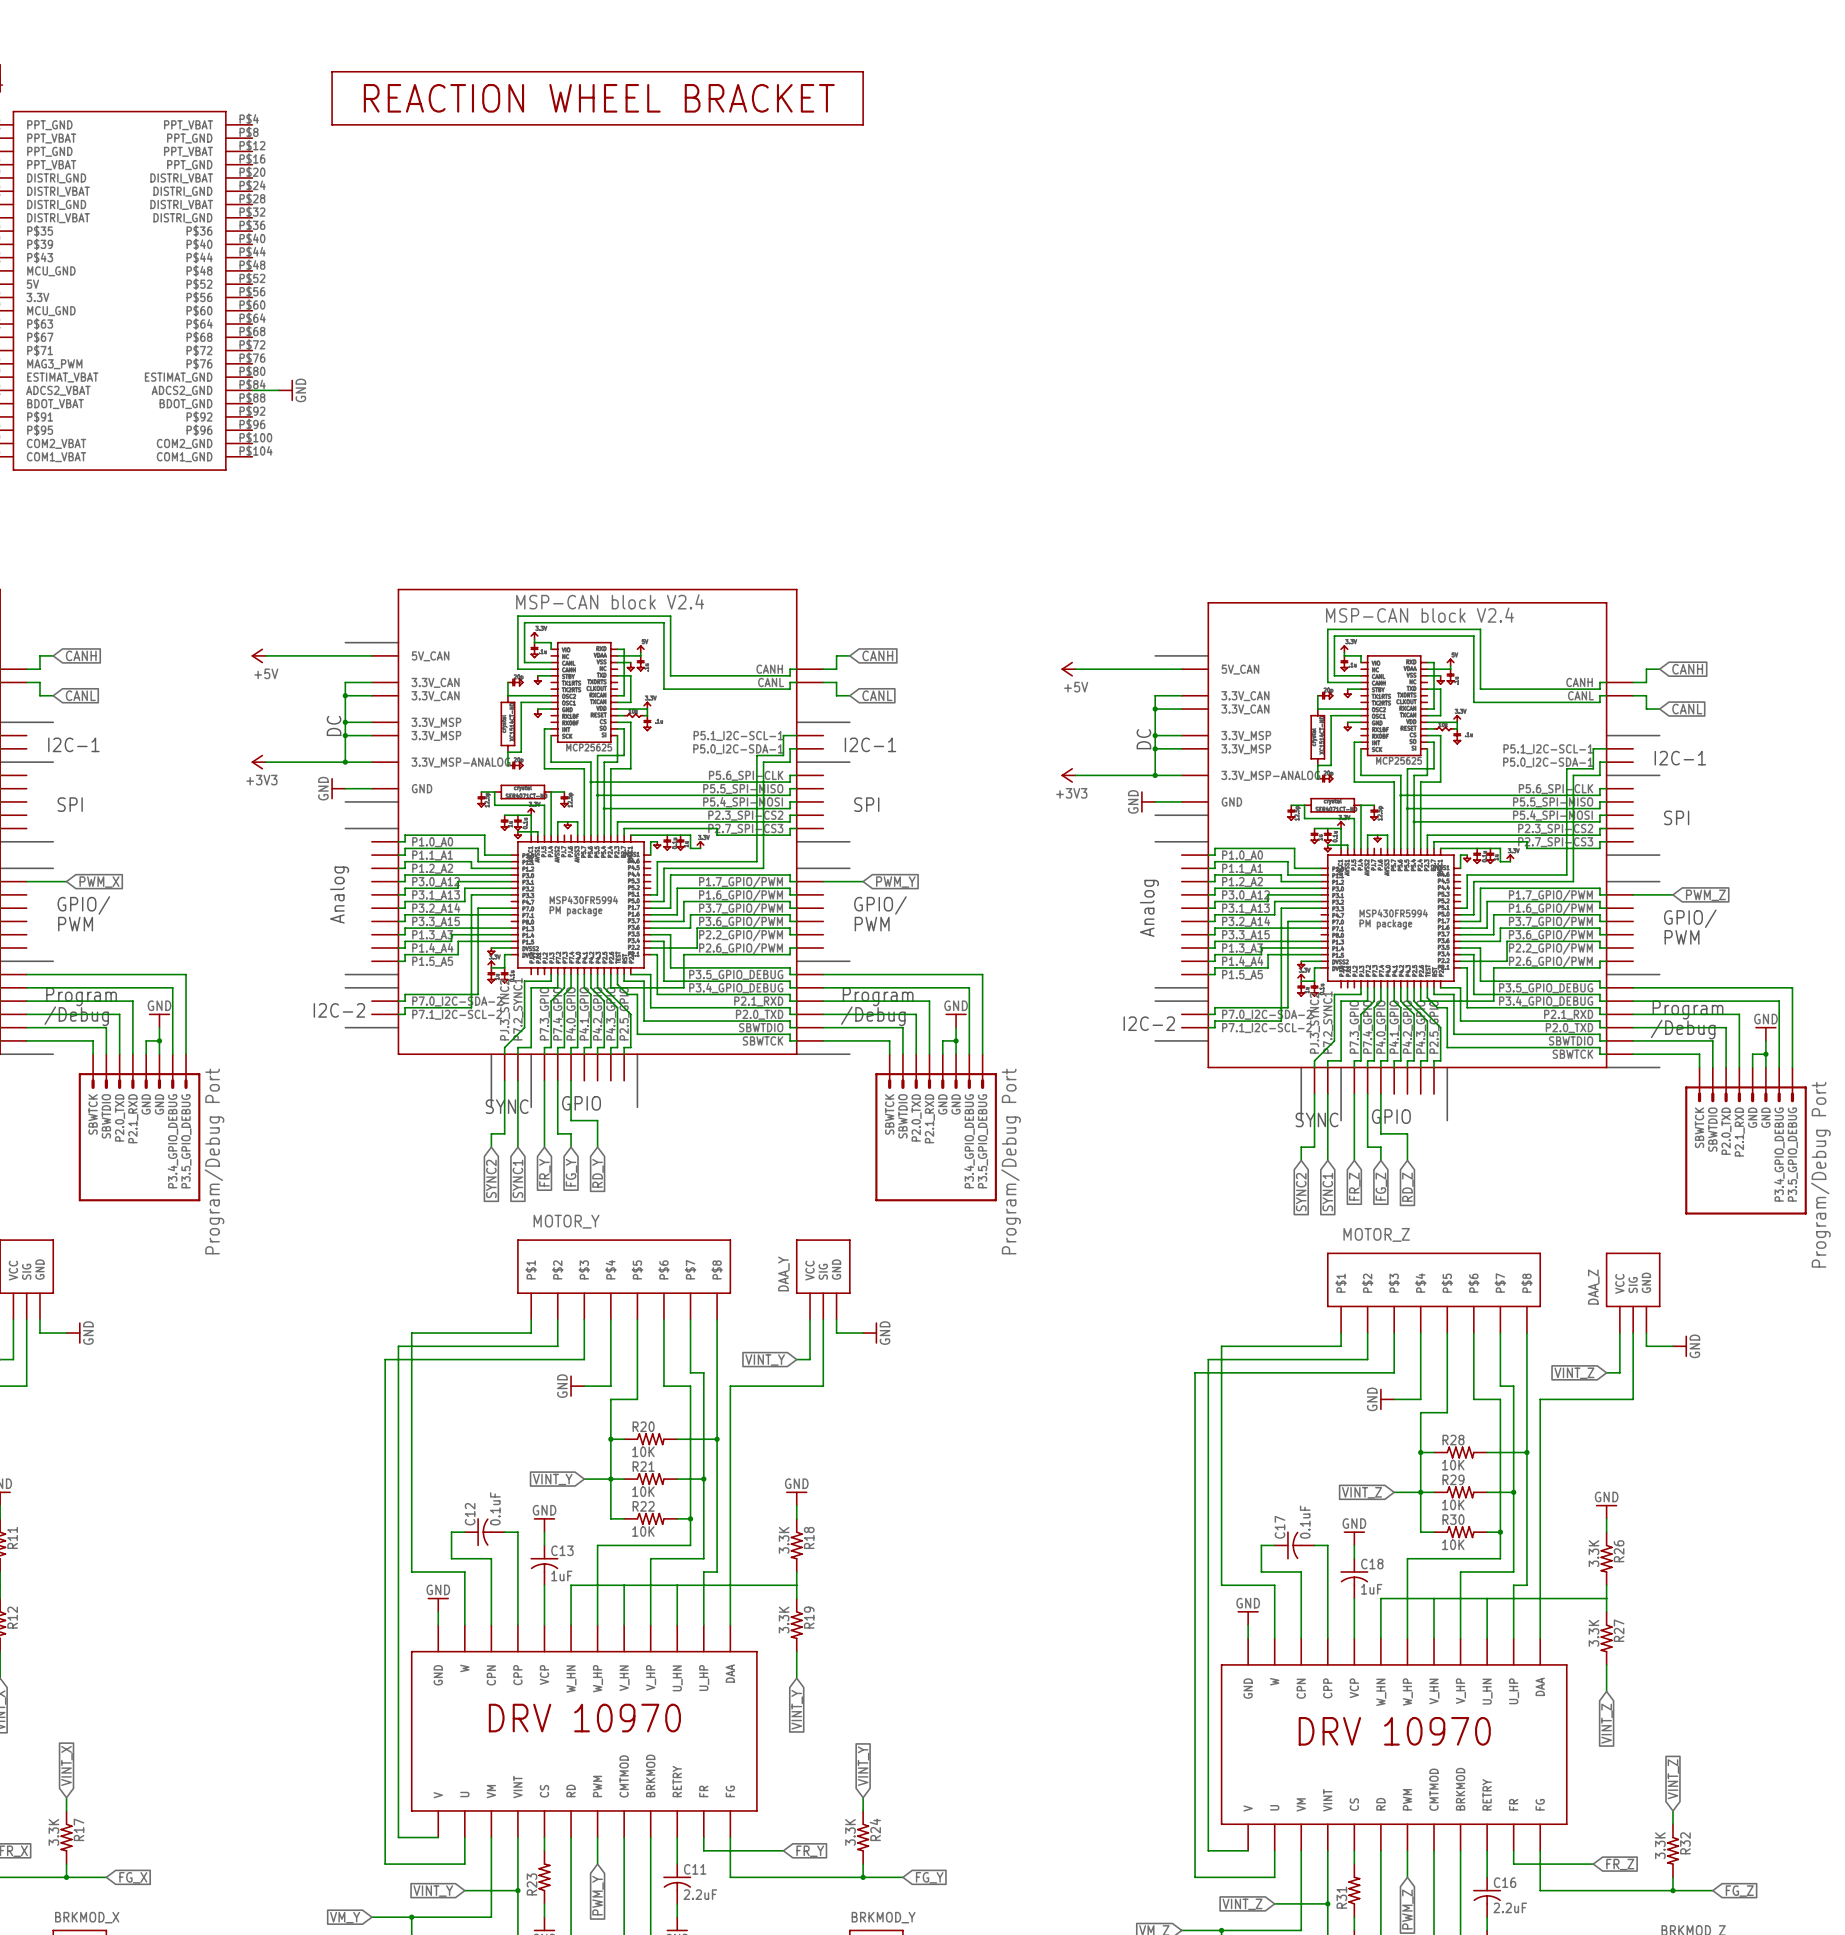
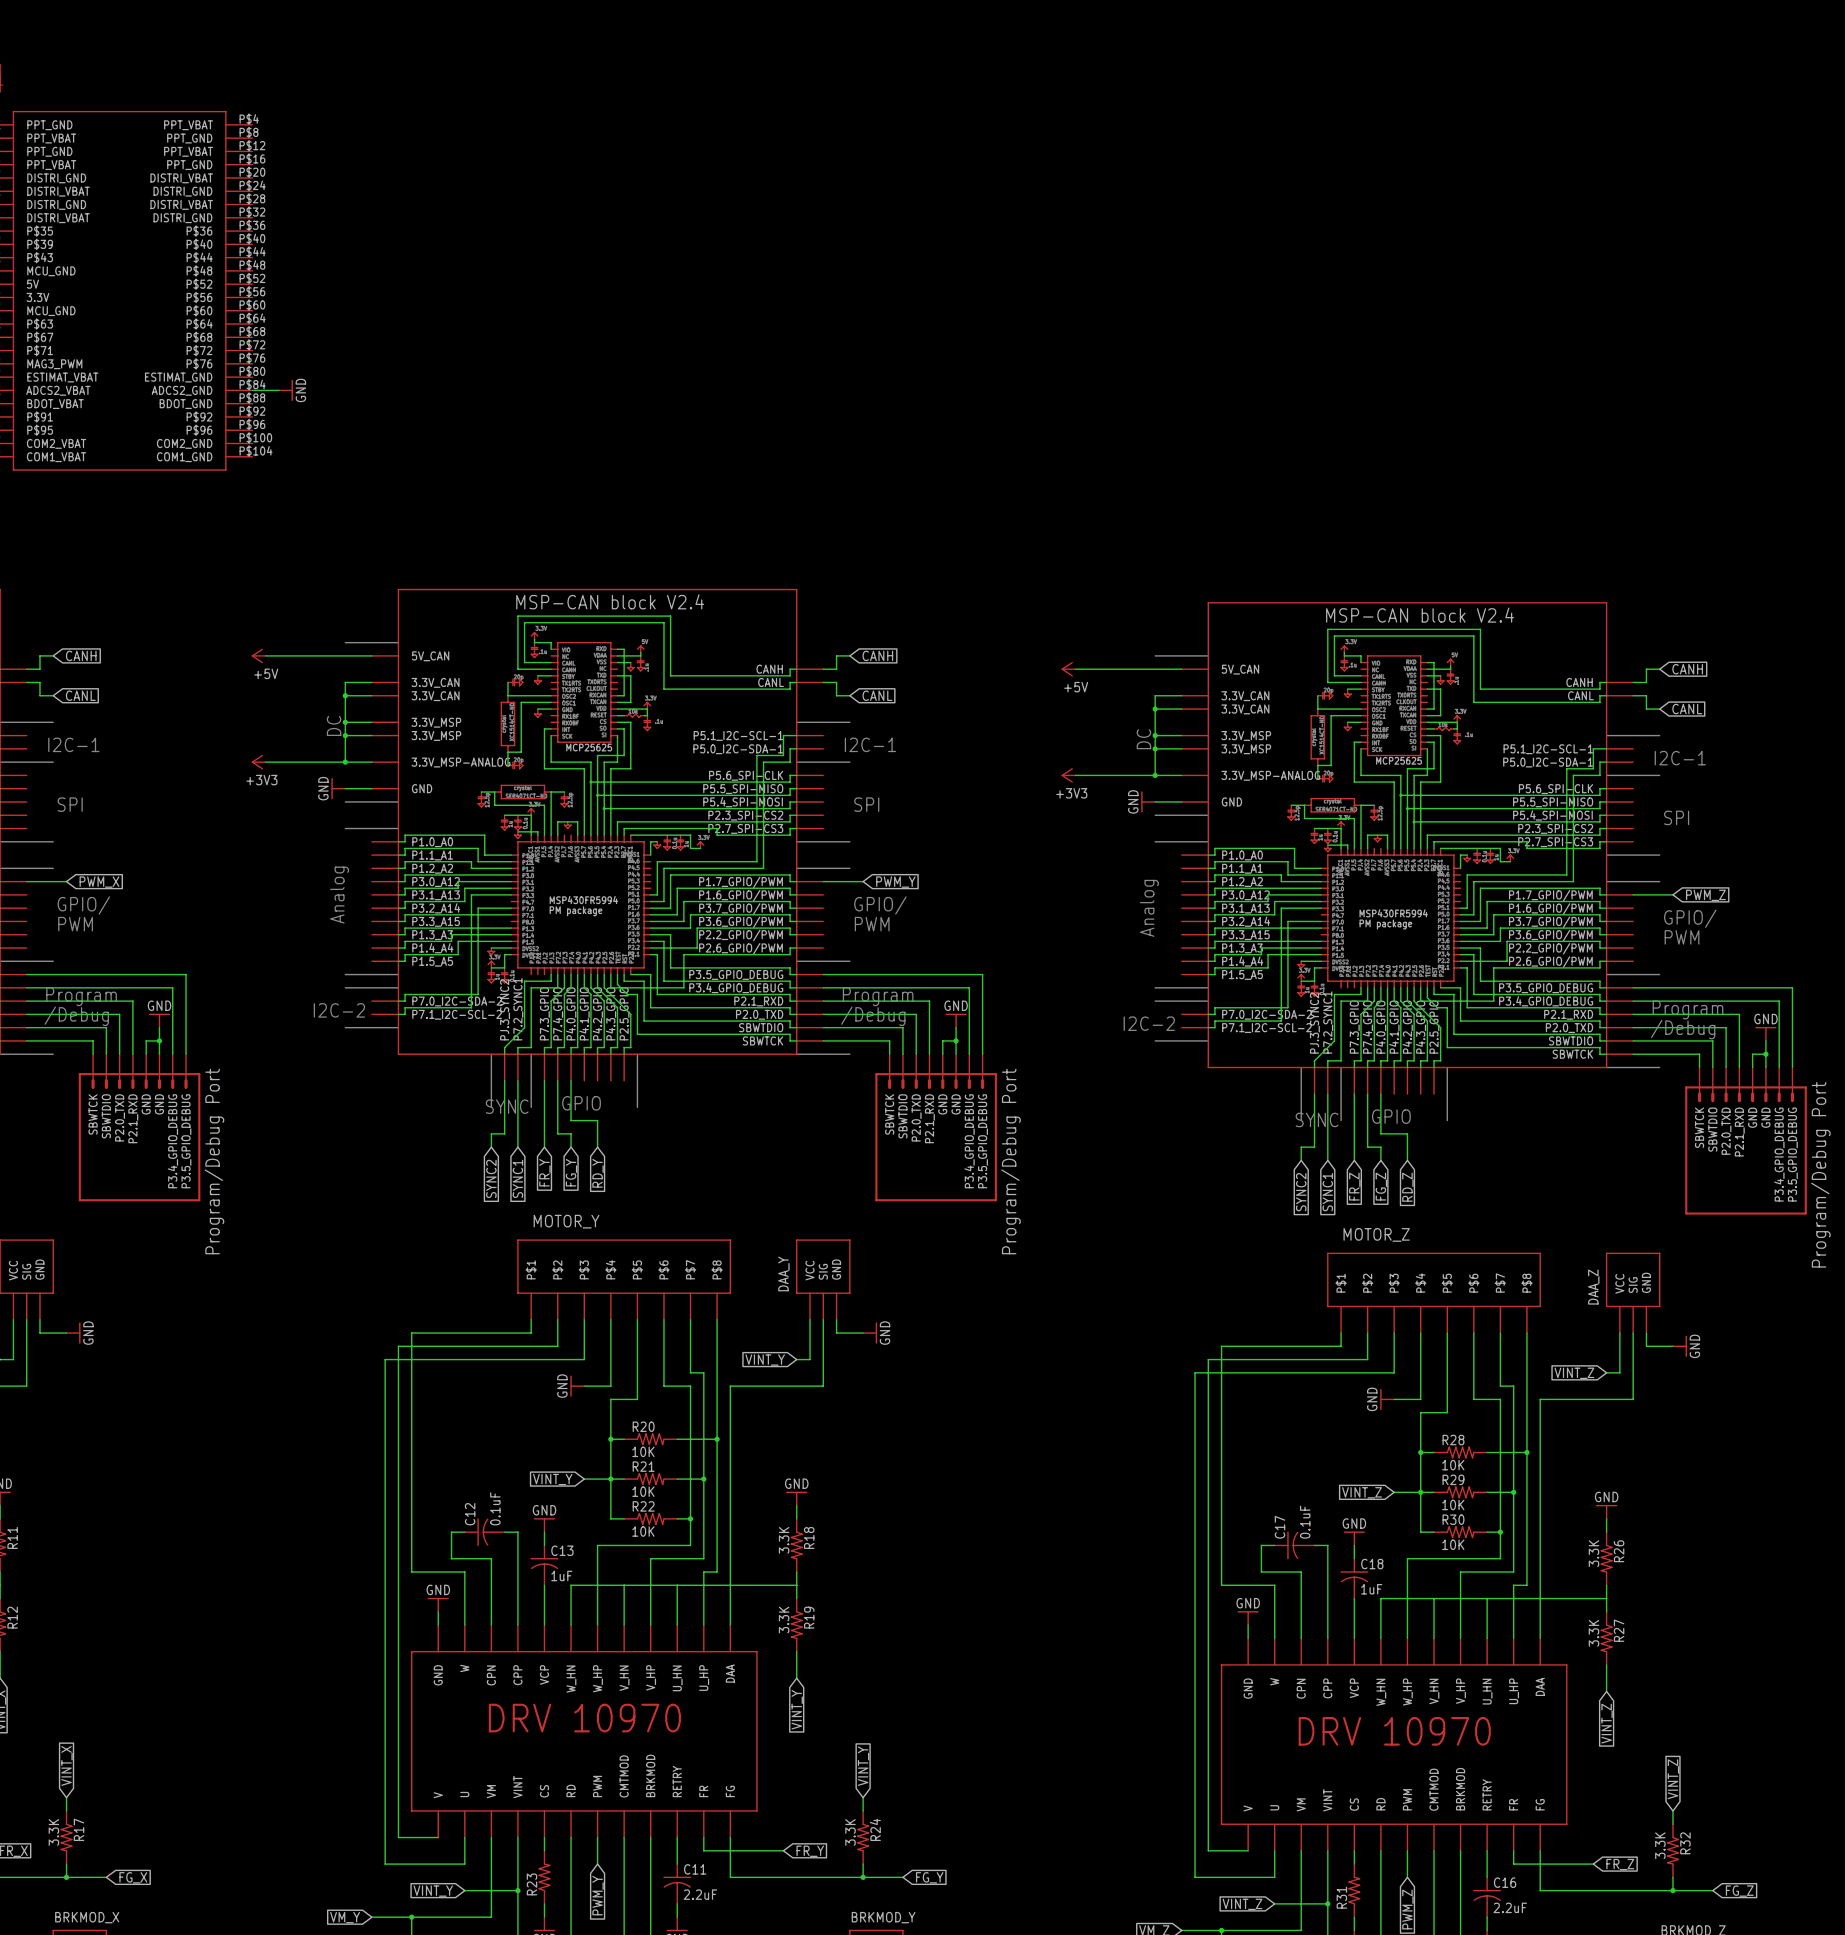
part: (597, 98) -> none

